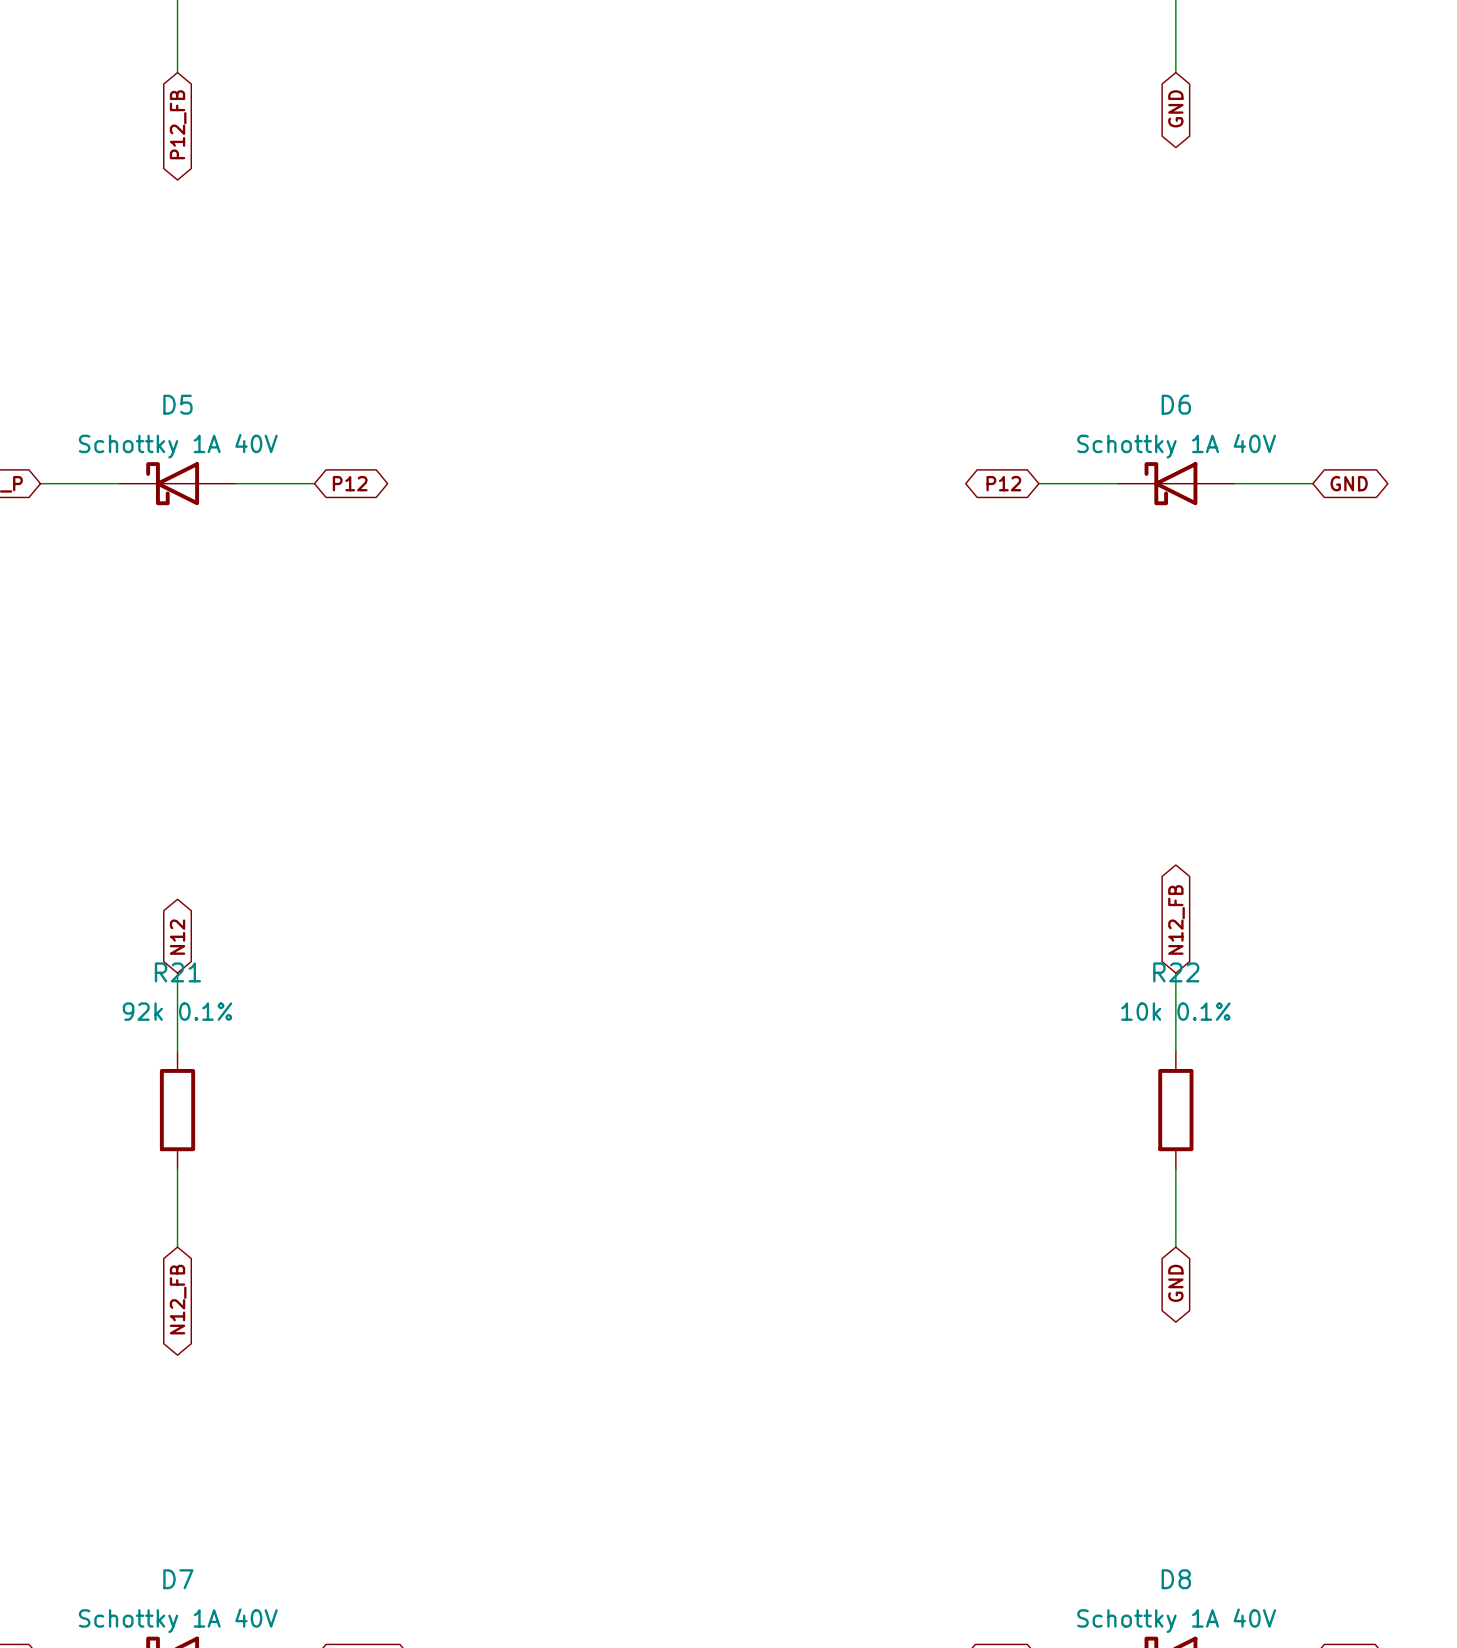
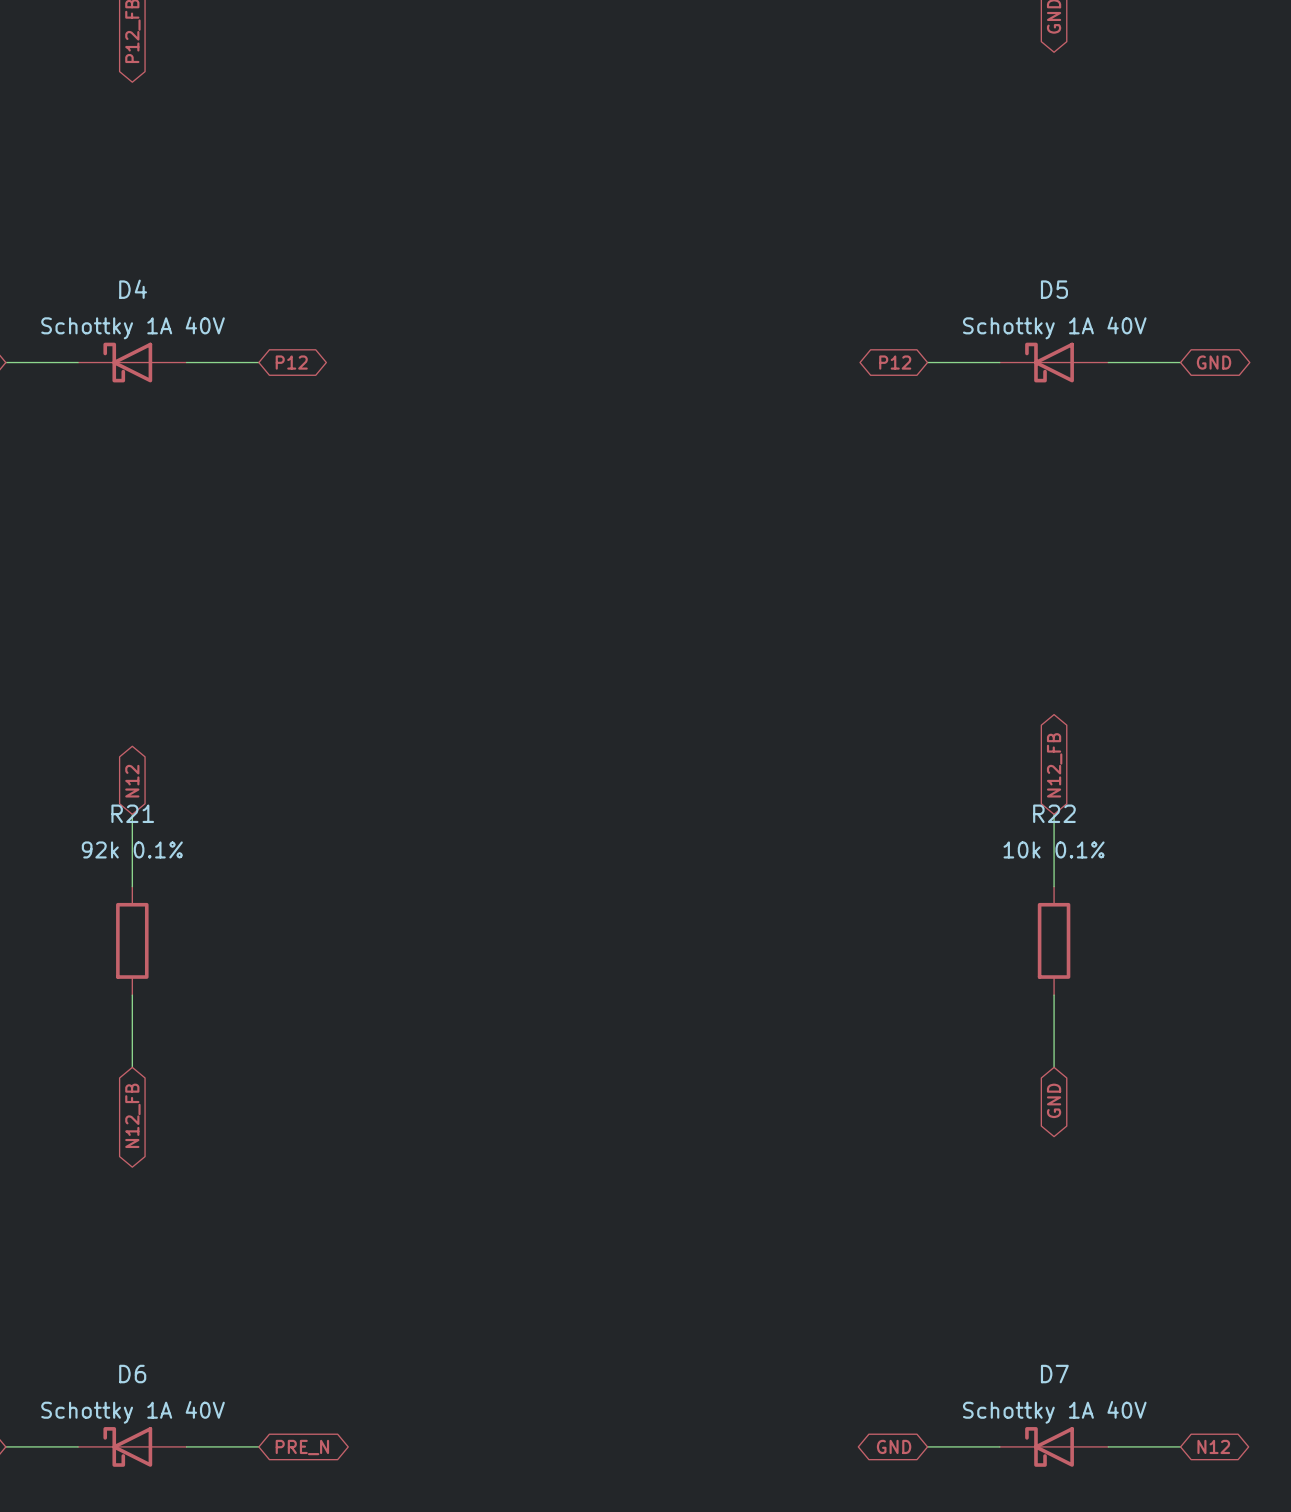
D5 name: D5 (177, 404) -> D4 (133, 289)
D6 name: D6 (1176, 404) -> D5 (1054, 289)
D7 name: D7 (178, 1579) -> D6 (132, 1374)
D8 name: D8 (1176, 1579) -> D7 (1054, 1374)

